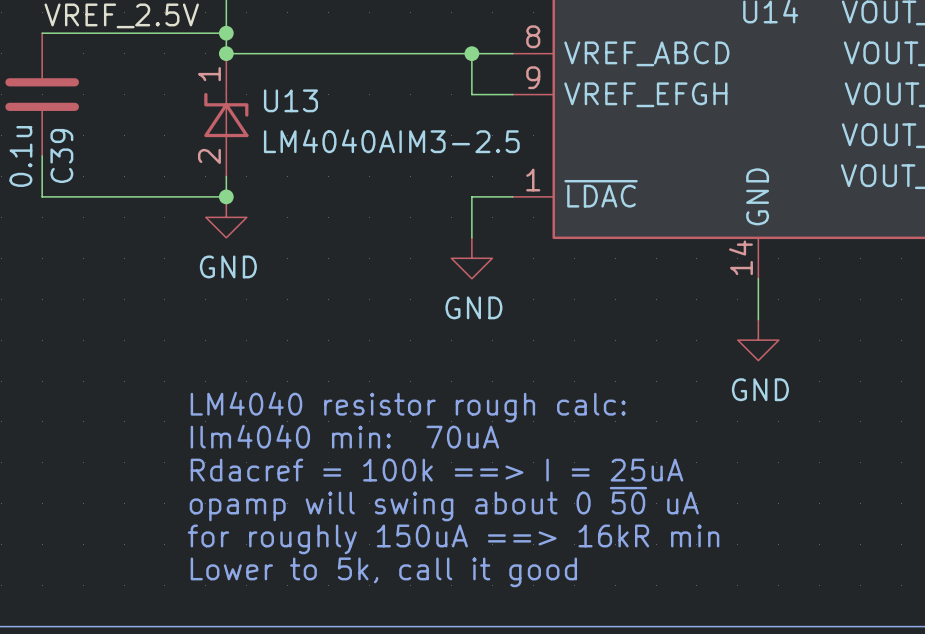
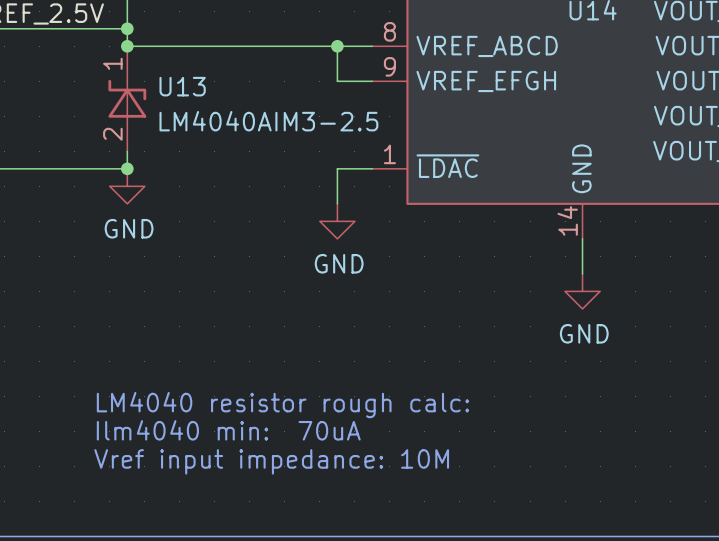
text: LM4040 resistor rough calc: (408, 407) -> none
text: Ilm4040 min: 70uA (344, 436) -> none
text: Rdacref = 100k ==> I = 25uA (436, 470) -> LM4040 resistor rough calc: (282, 405)
text: opamp will swing about 0 ~{50} uA (444, 504) -> Ilm4040 min: 70uA (228, 430)
text: for roughly 150uA ==> 16kR min (453, 539) -> Vref input impedance: 10M (271, 461)
text: Lower to 5k, call it good (383, 572) -> none

